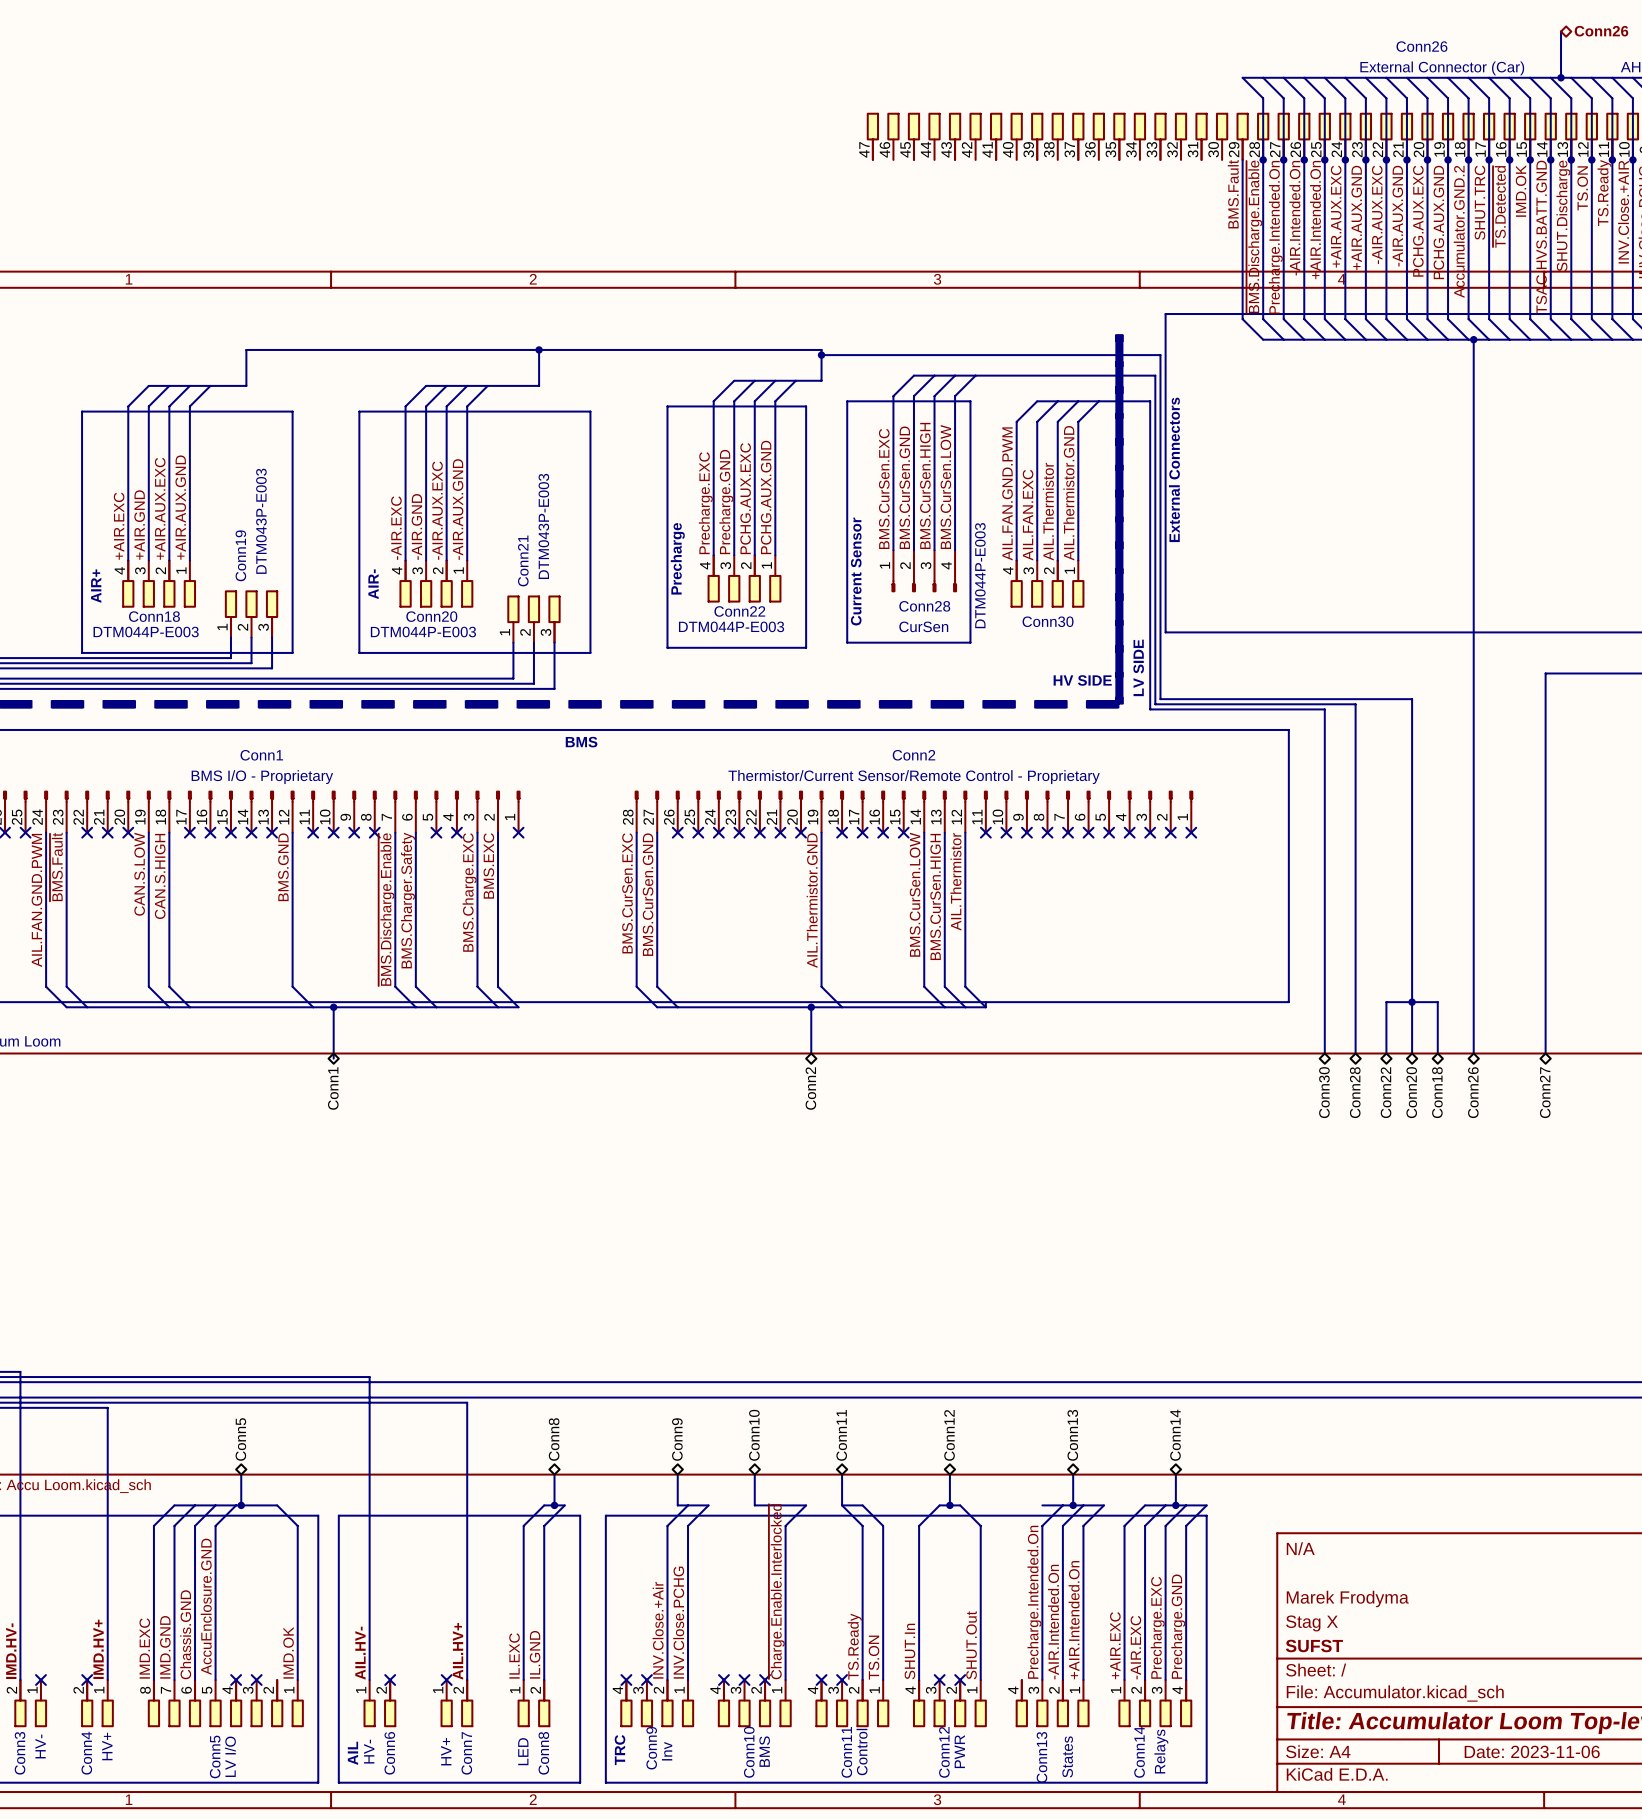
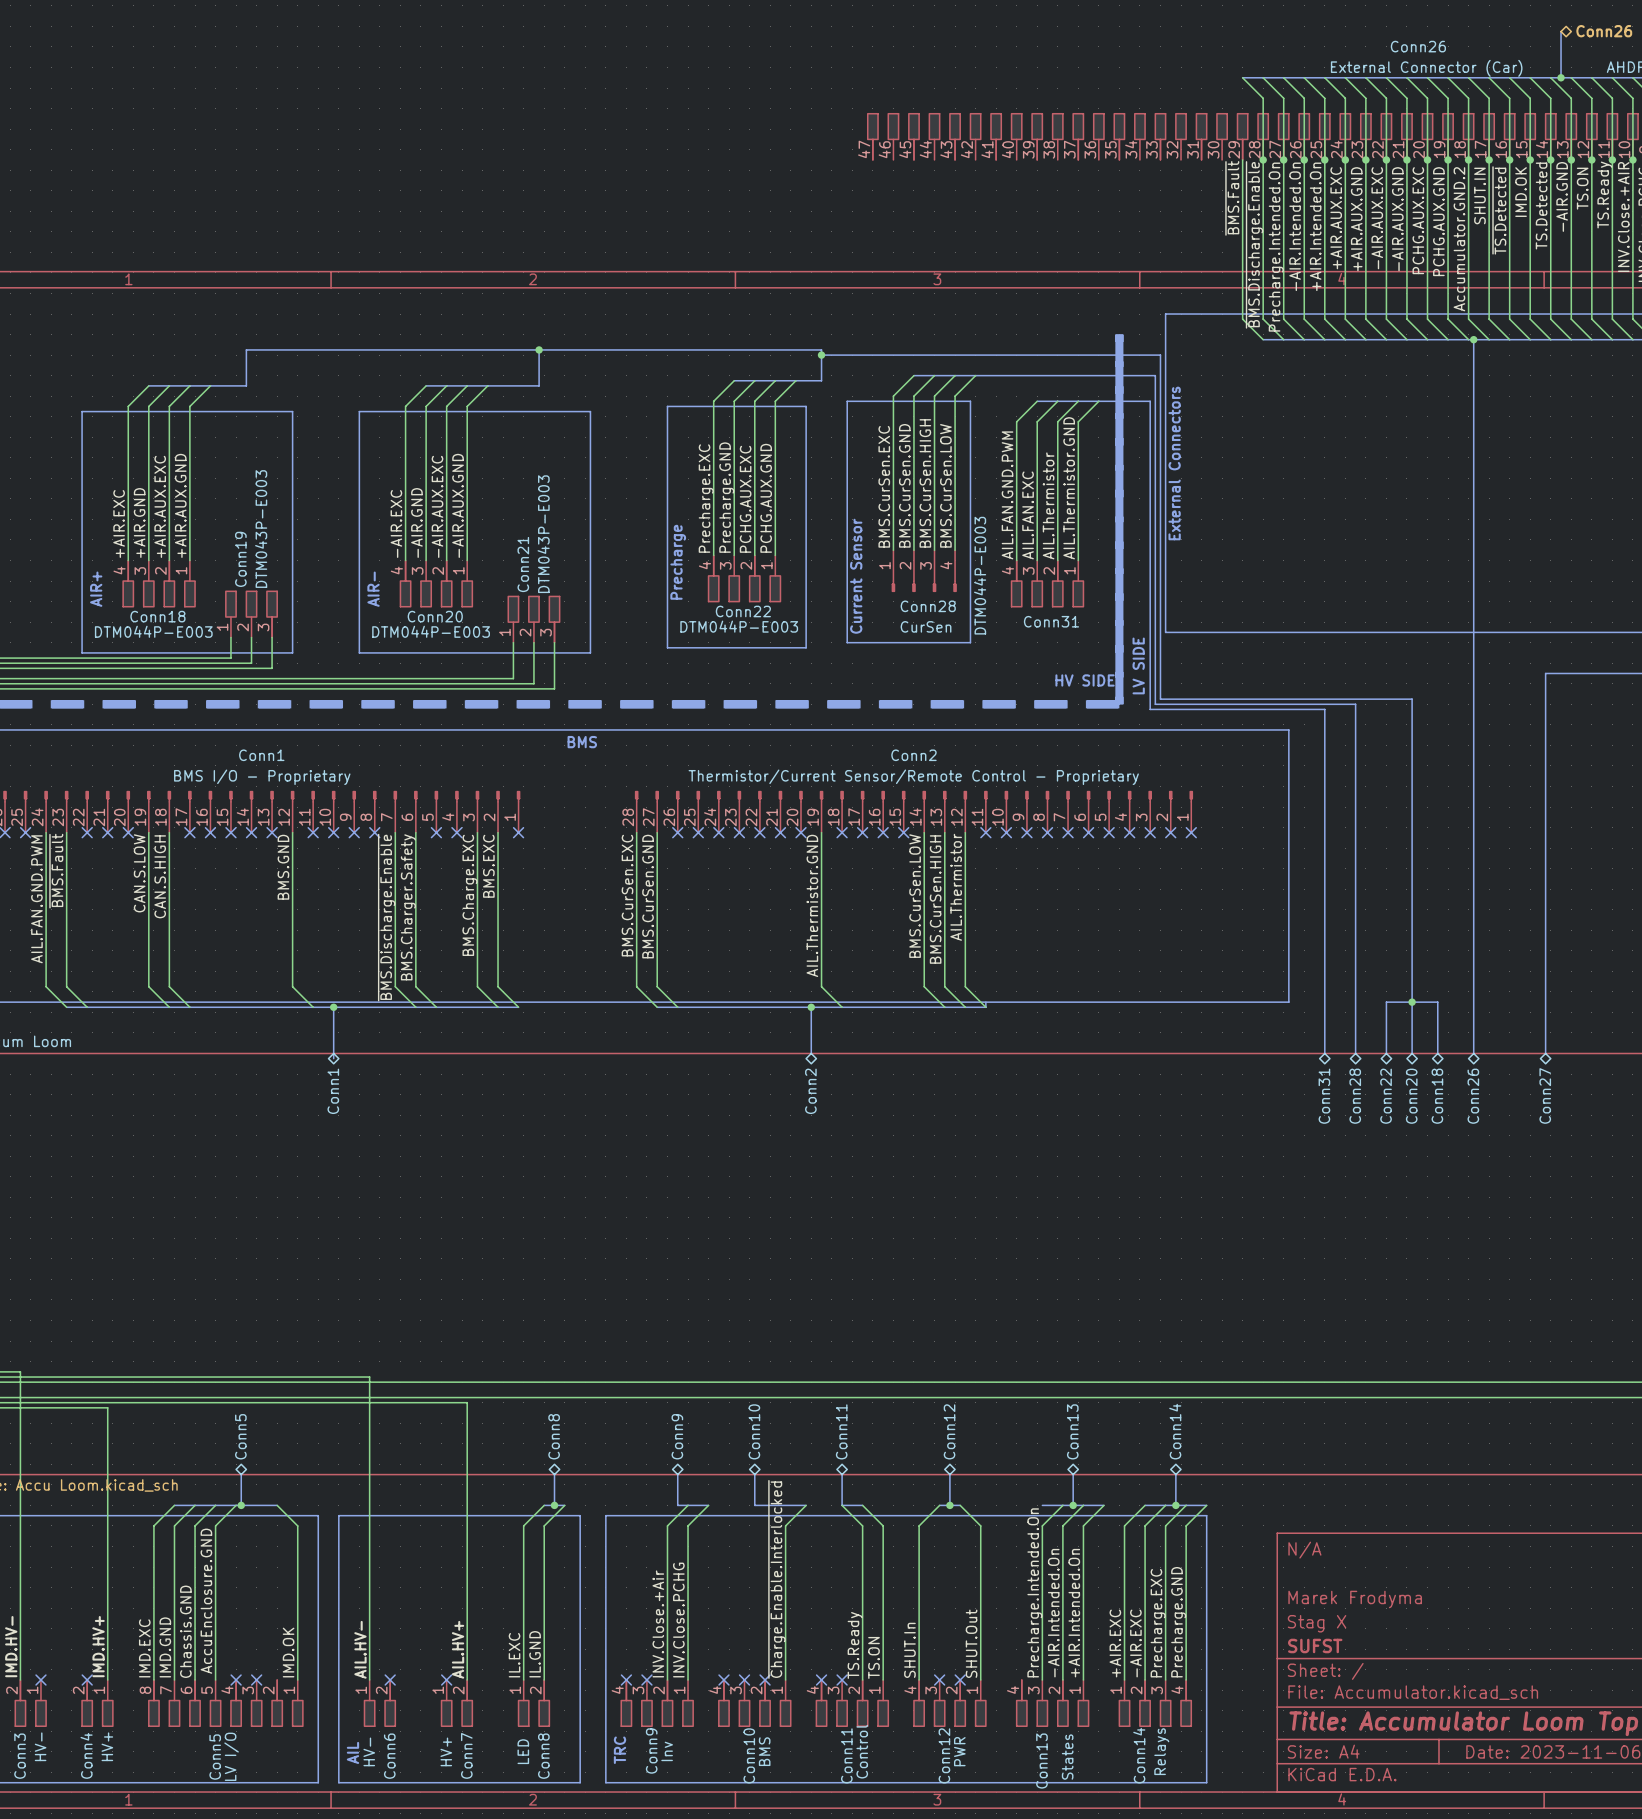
label: BMS.Fault (1233, 194) -> ~{BMS.Fault} (1232, 198)
label: SHUT.TRC (1479, 202) -> SHUT.IN (1479, 195)
label: SHUT.Discharge (1563, 215) -> -AIR.GND (1562, 196)
label: TSAC.HVS.BATT.GND (1541, 237) -> TS.Detected (1541, 206)
Conn30 name: Conn30 (1048, 621) -> Conn31 (1051, 621)
sheet pin: Conn30 (1324, 1092) -> Conn31 (1324, 1096)

